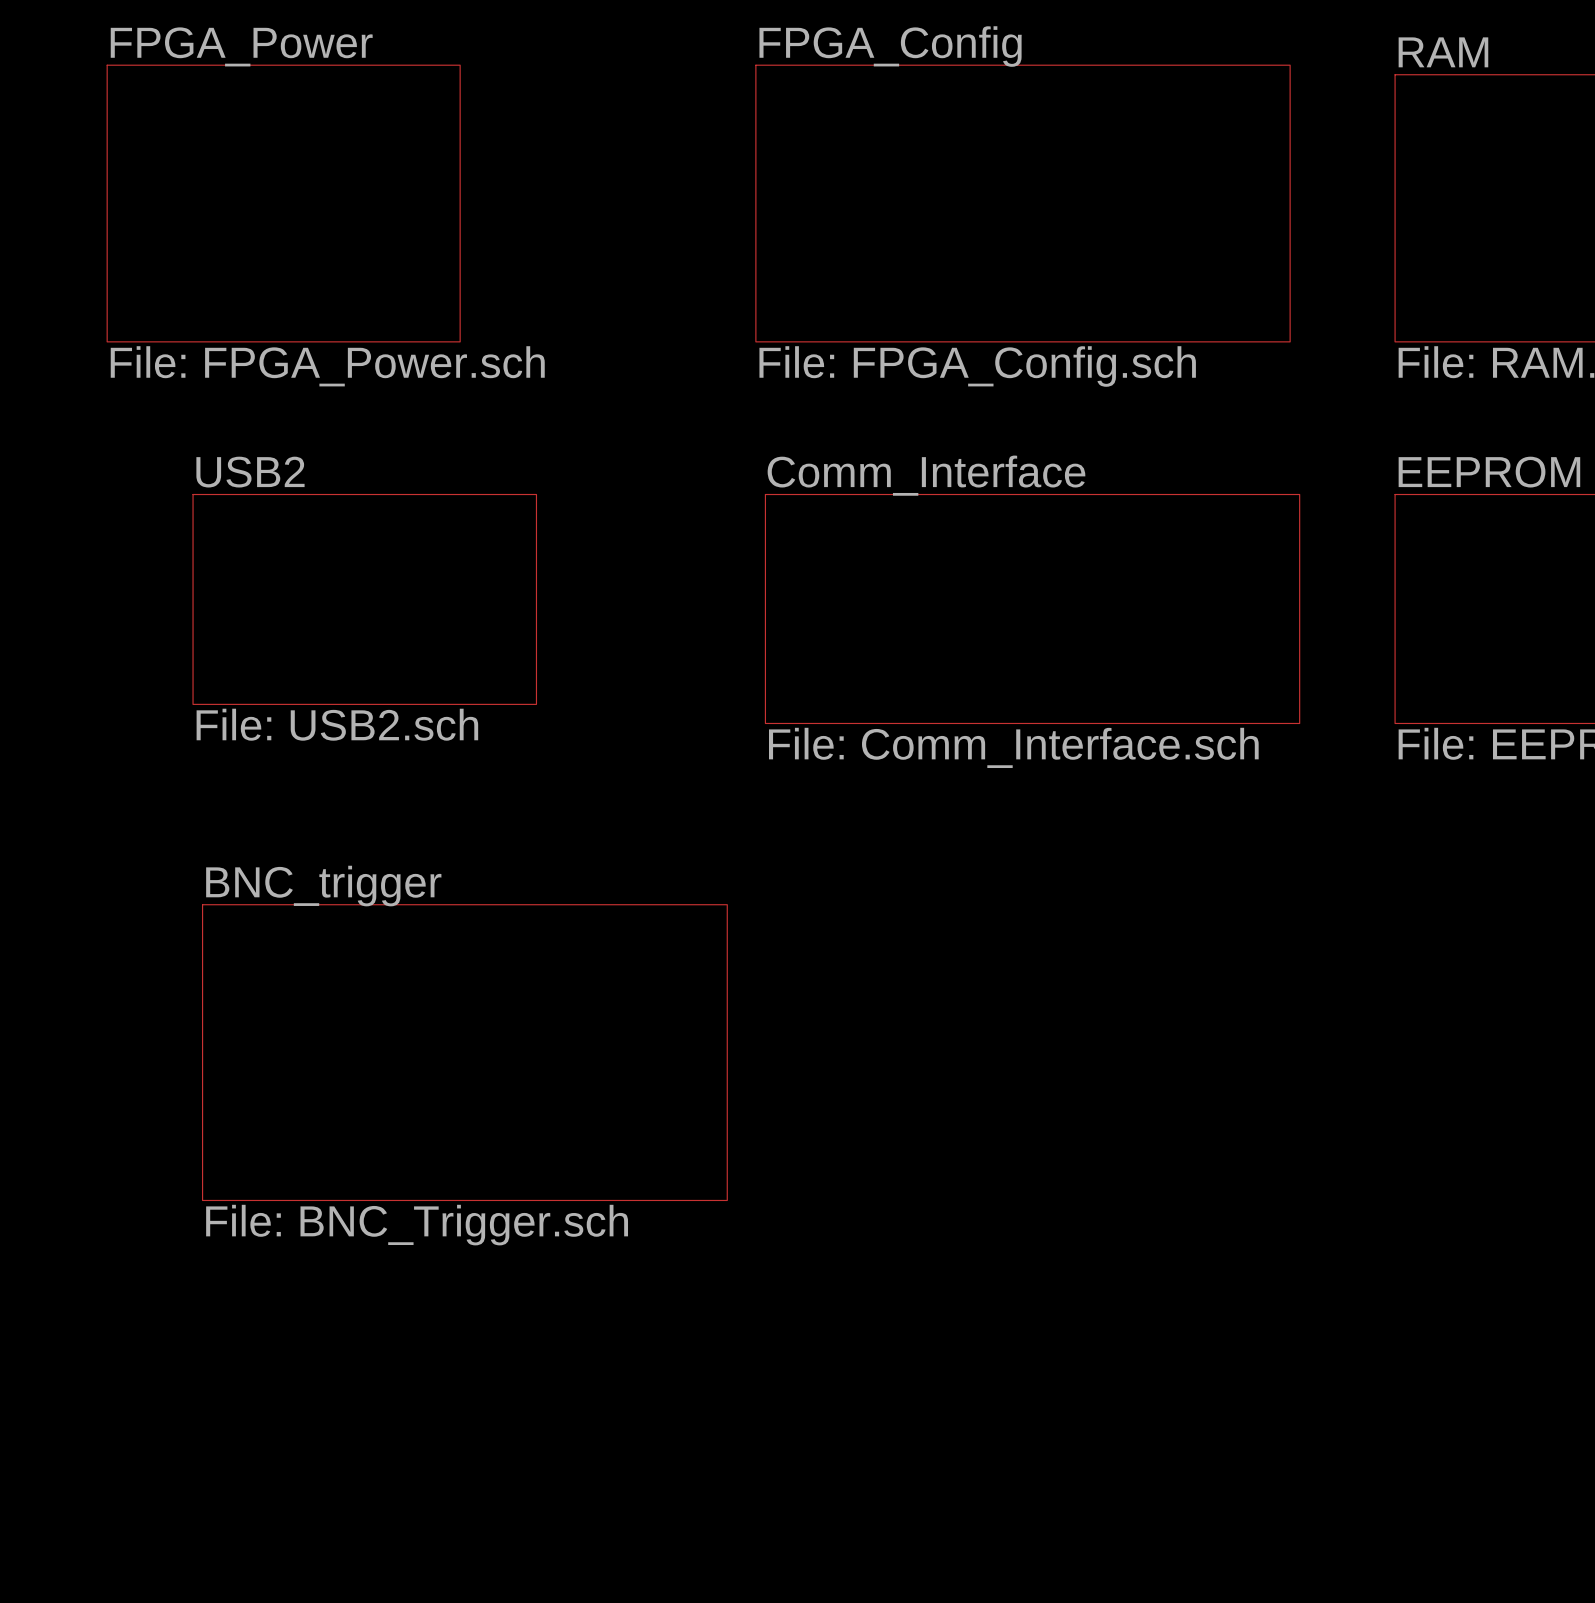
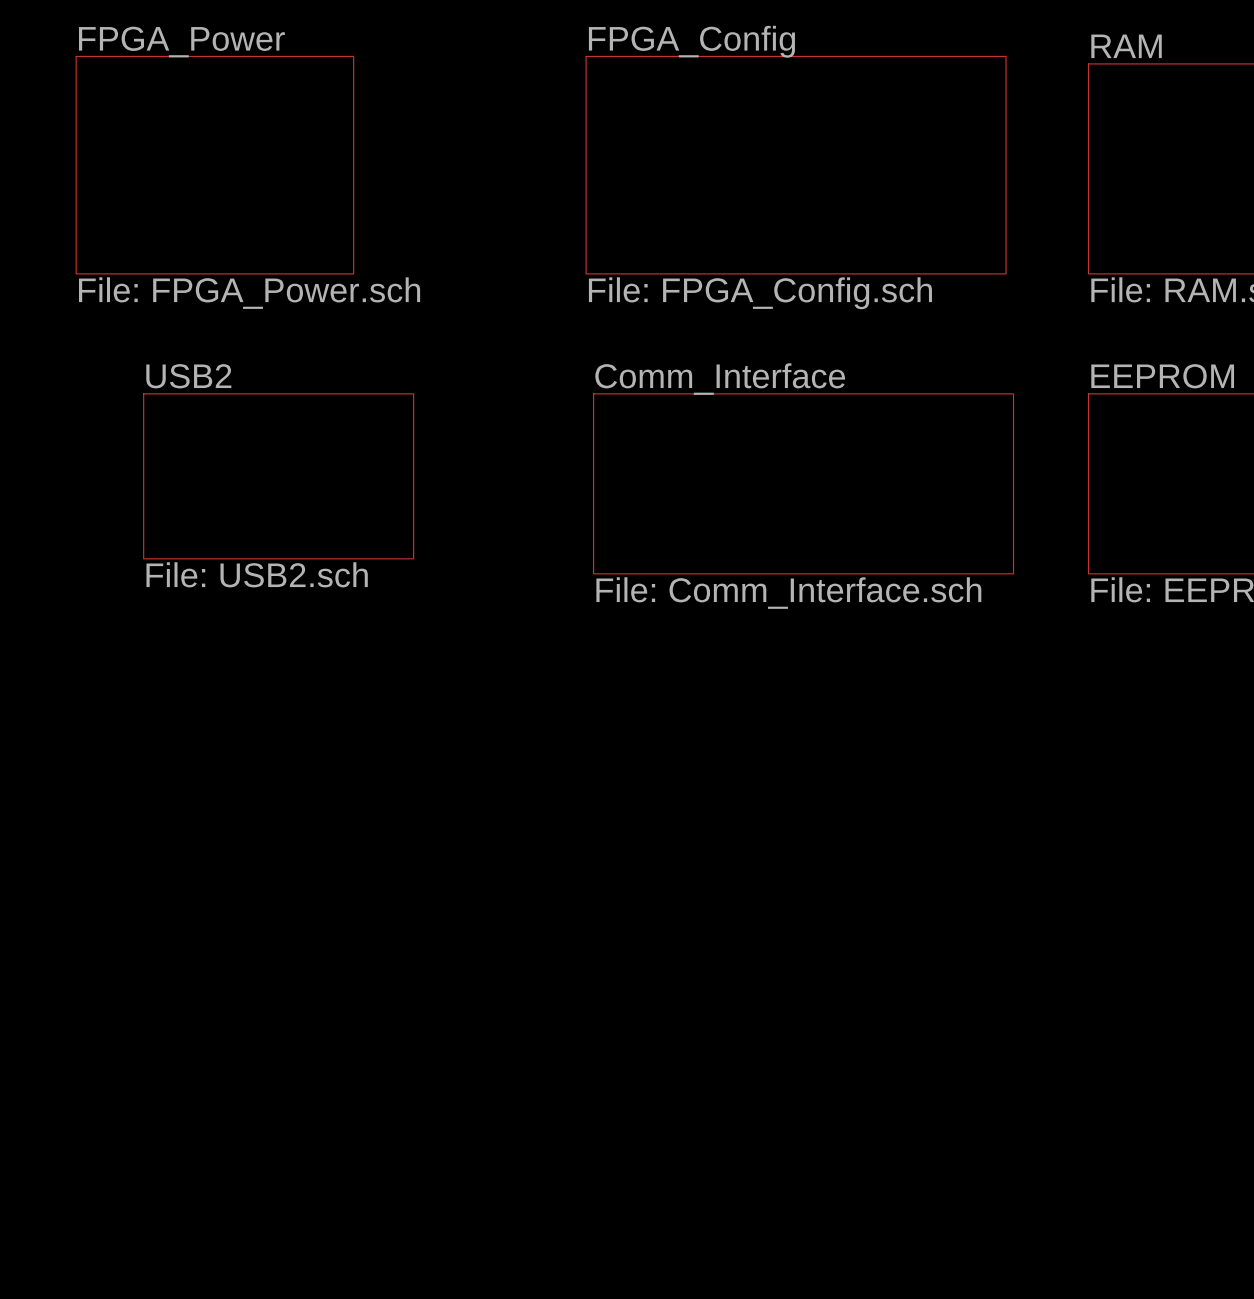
sheet BNC_trigger: File: BNC_Trigger.sch (464, 1052) -> none

